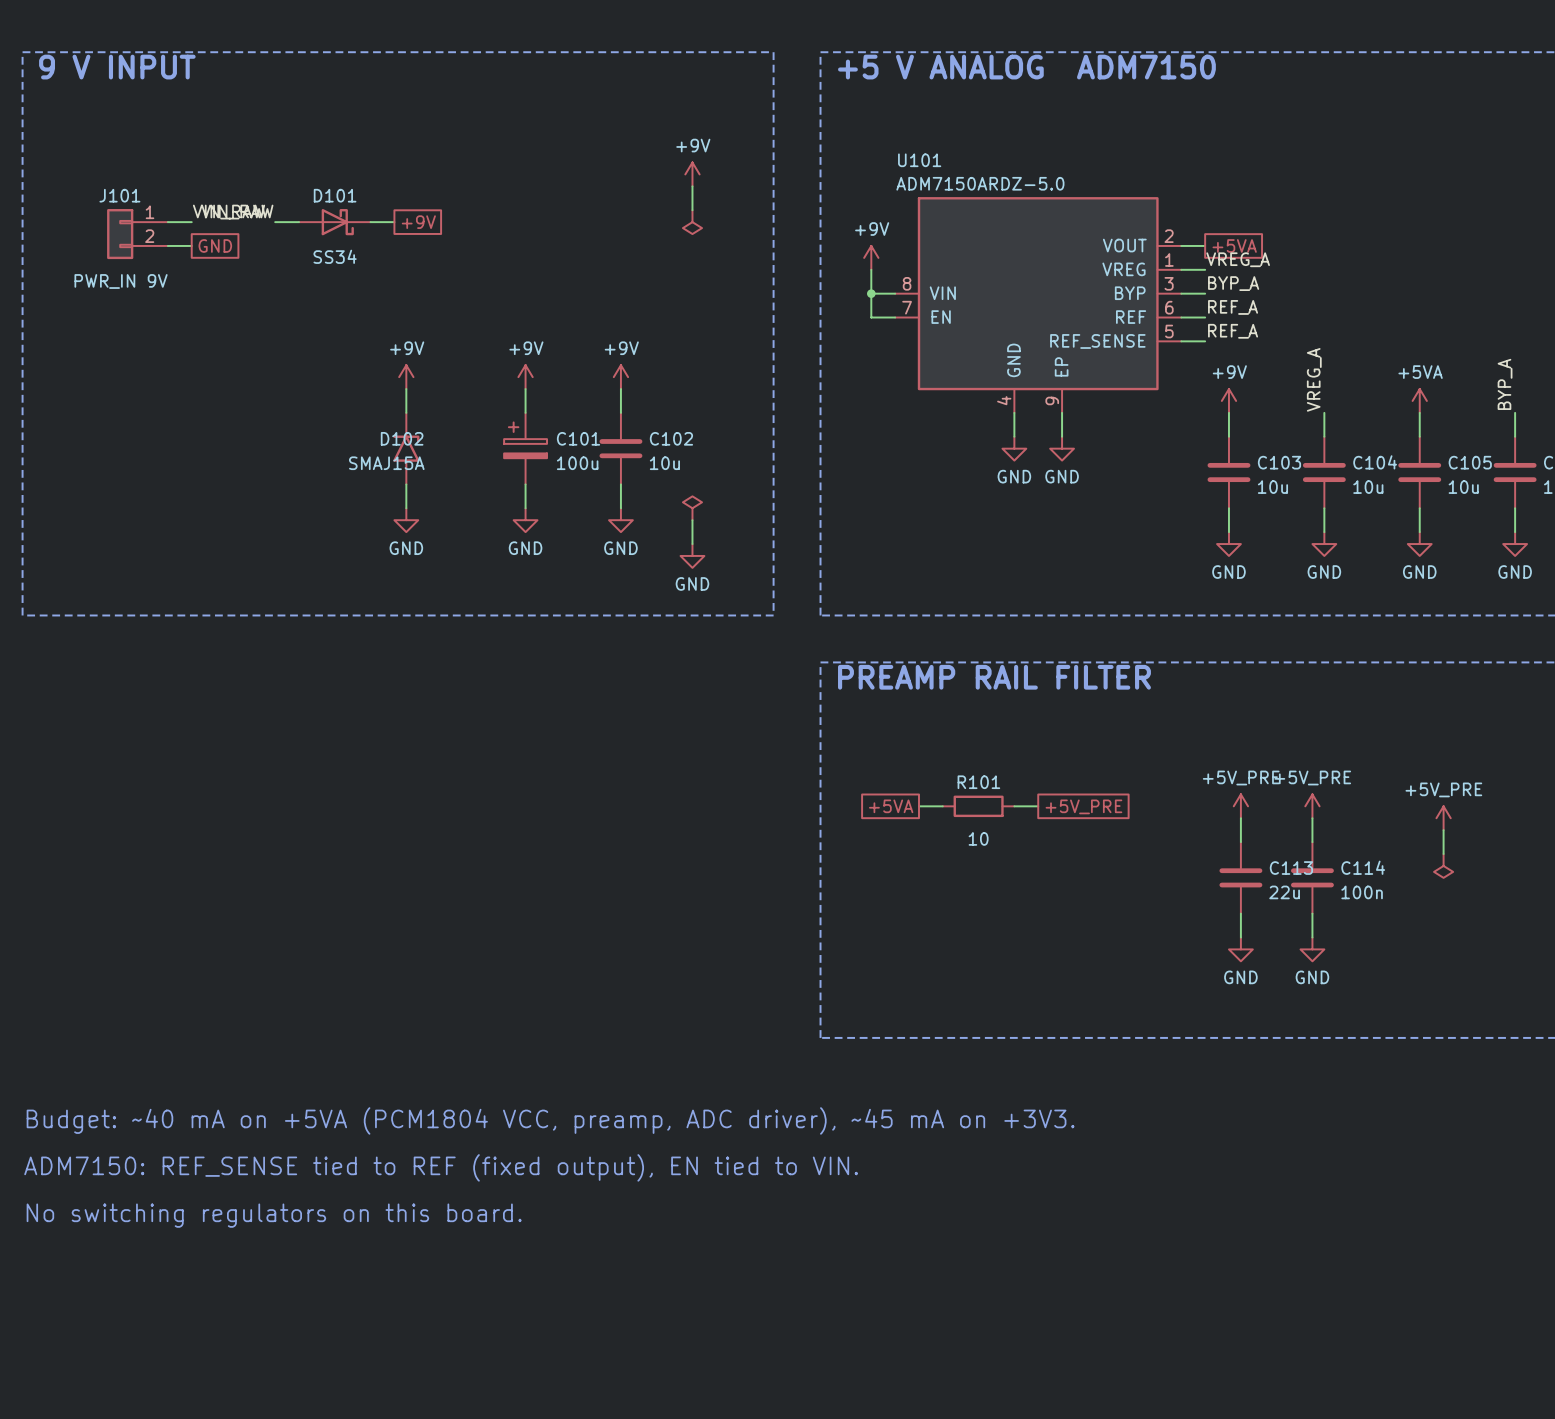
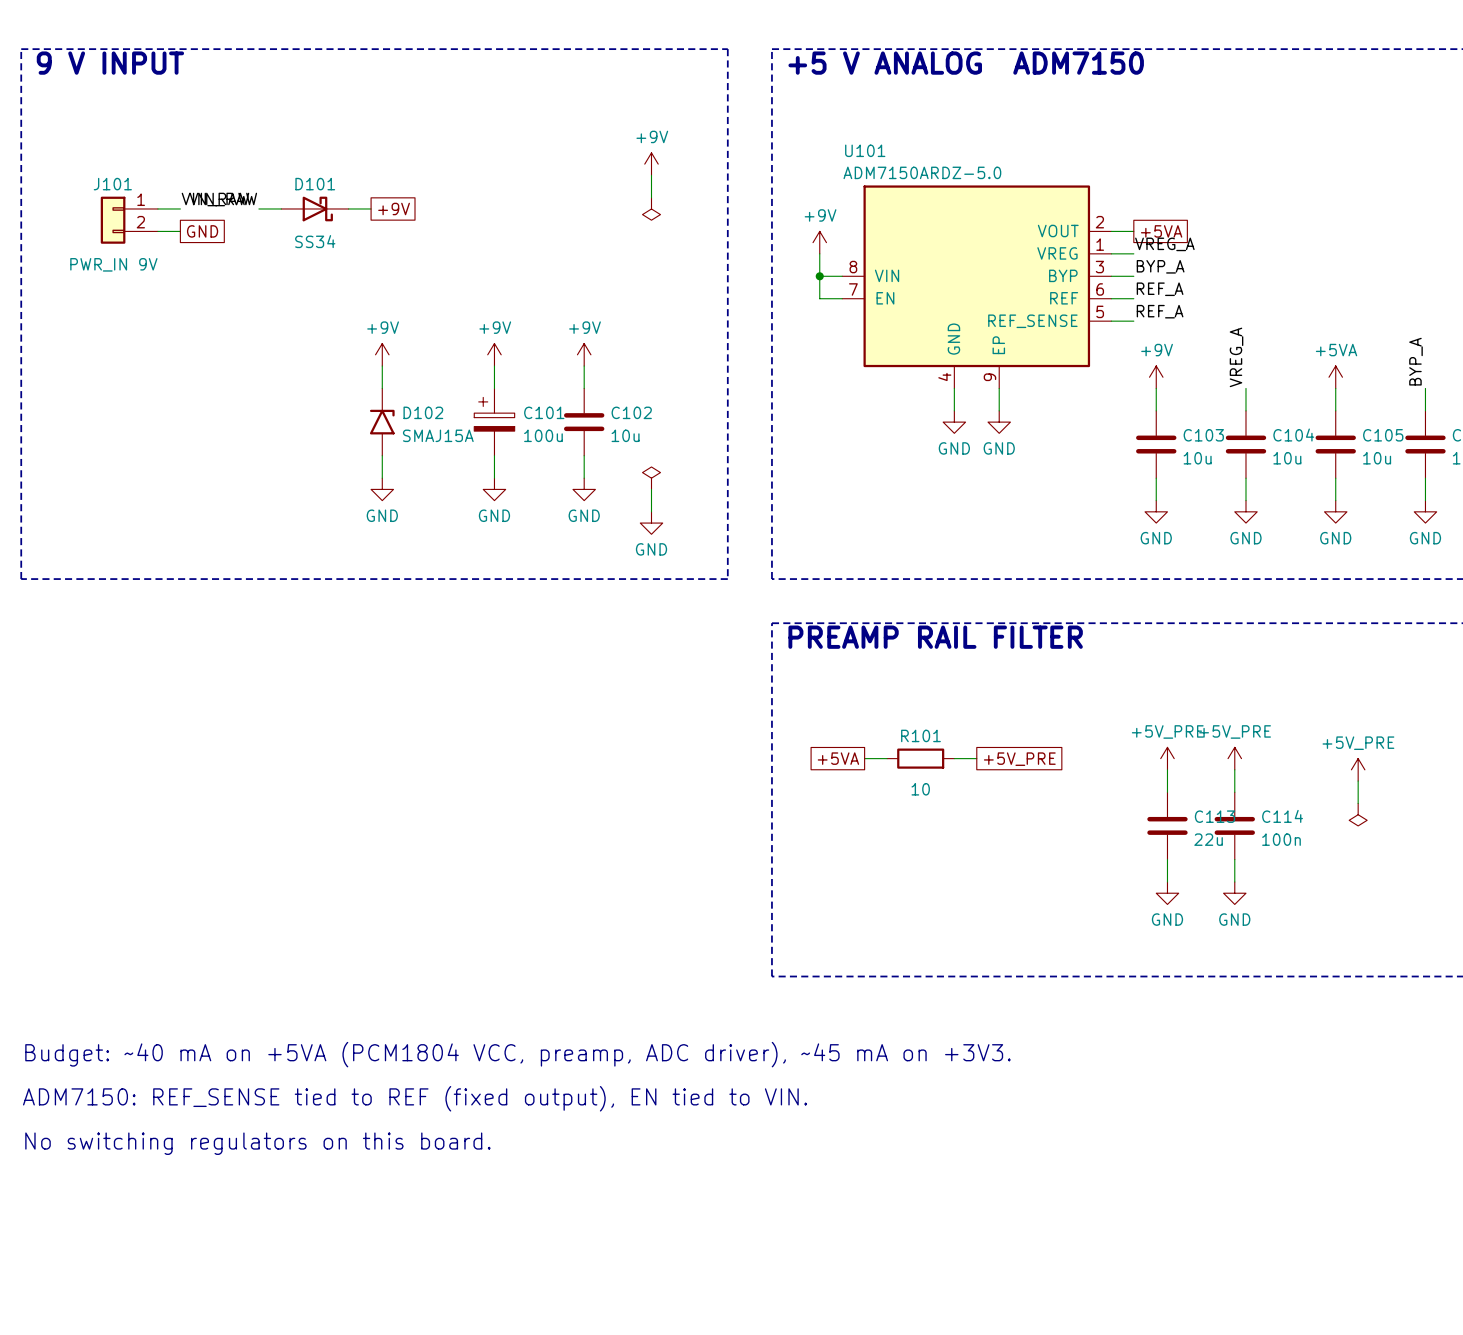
D102 name position: D102 (402, 438) -> D102 (423, 412)
D102 value position: SMAJ15A (386, 463) -> SMAJ15A (438, 435)

